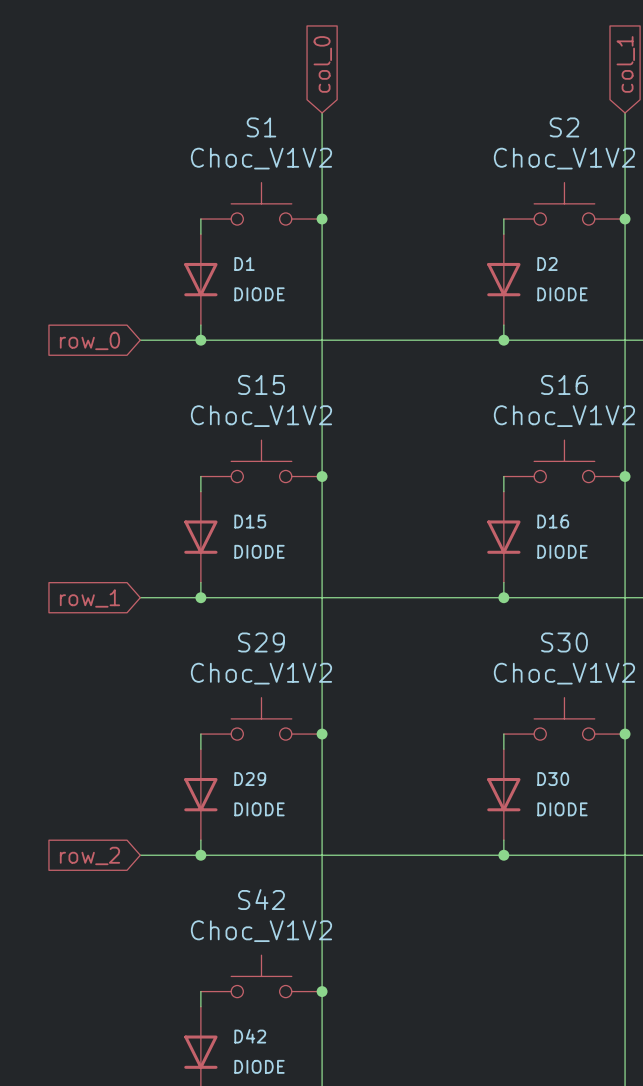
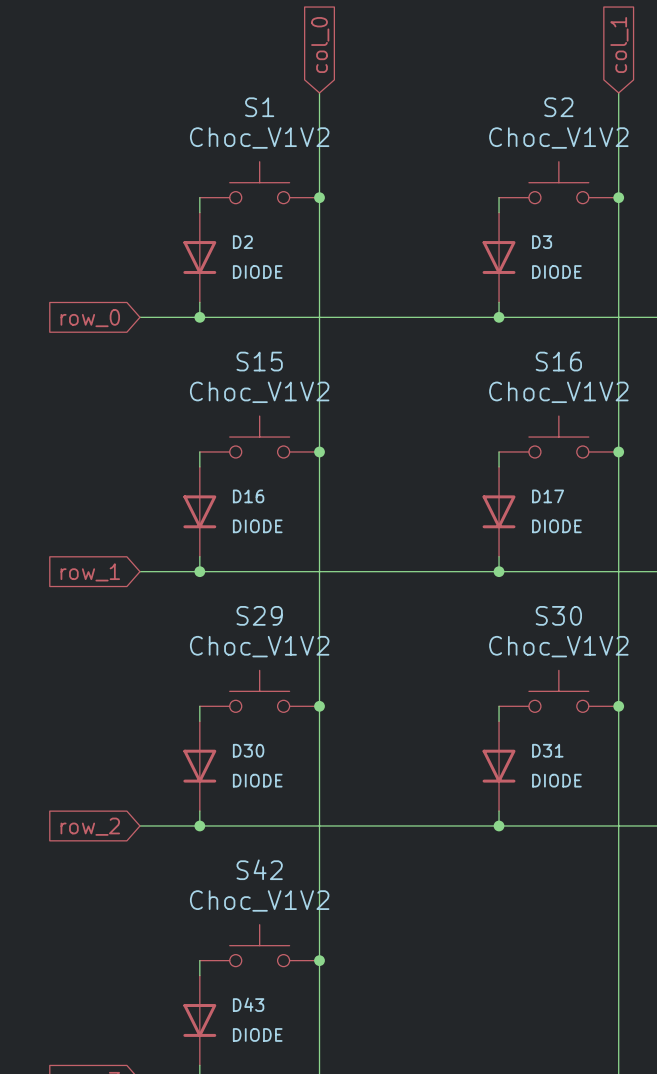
D1 name: D1 (244, 264) -> D2 (242, 242)
D2 name: D2 (547, 264) -> D3 (542, 242)
D15 name: D15 (250, 521) -> D16 (248, 496)
D16 name: D16 (553, 521) -> D17 (548, 496)
D29 name: D29 (250, 779) -> D30 (248, 750)
D30 name: D30 (553, 779) -> D31 (547, 750)
D42 name: D42 (250, 1036) -> D43 (248, 1004)

